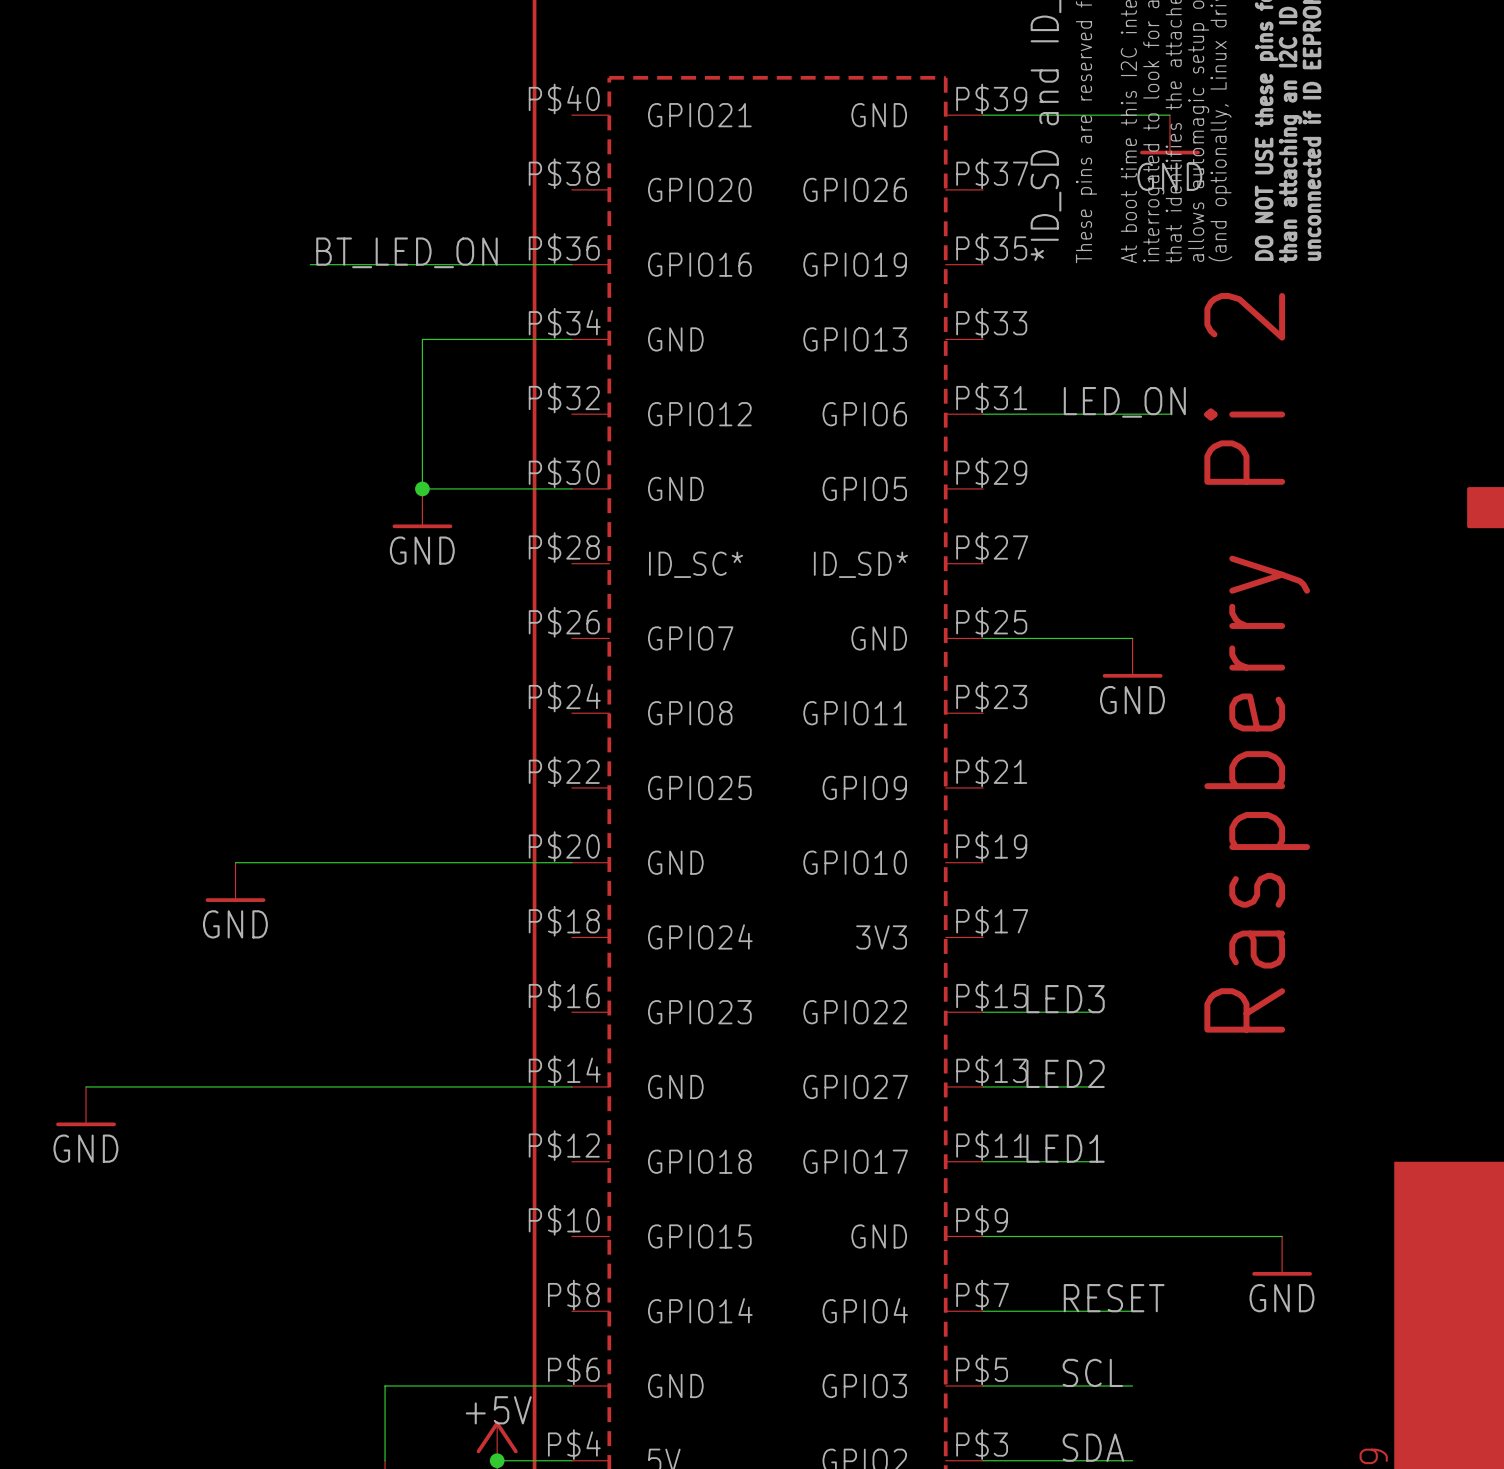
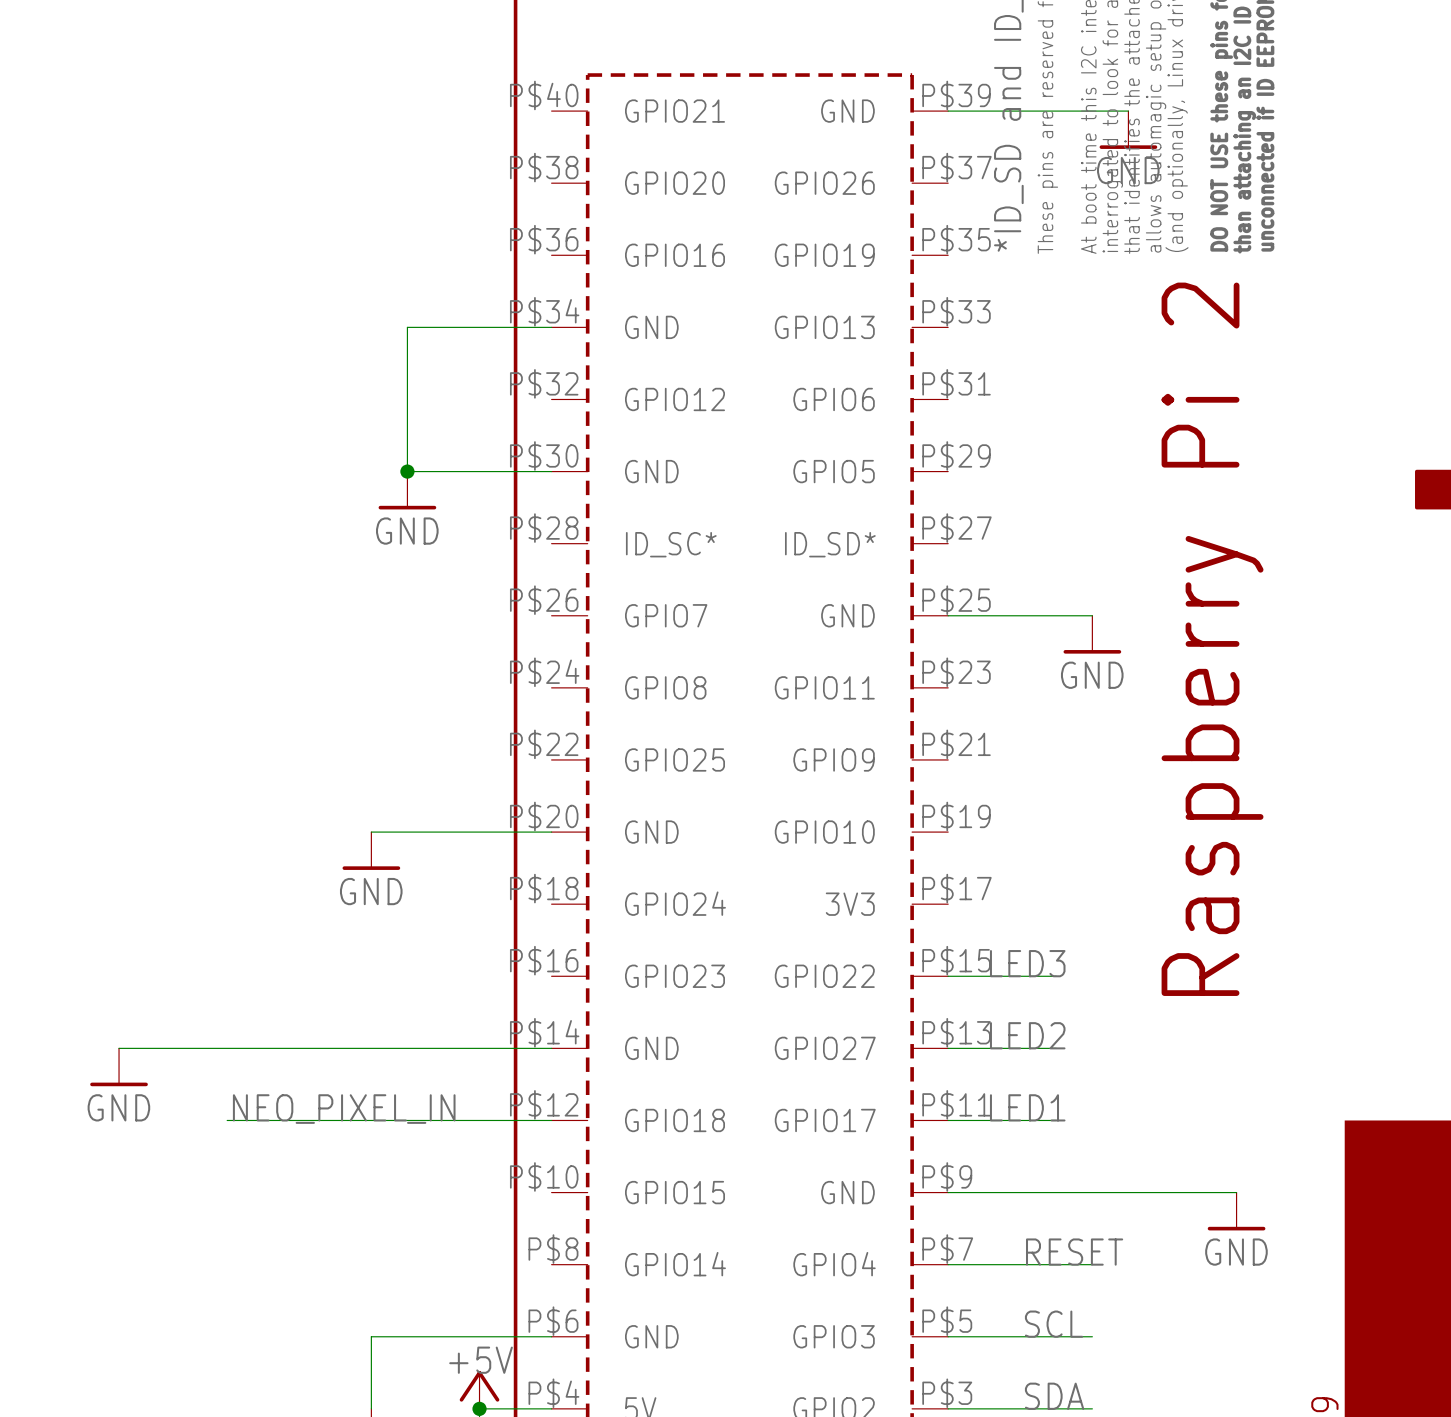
label: BT_LED_ON (406, 252) -> none
wire: (310, 264) (571, 264) -> none
label: LED_ON (1124, 402) -> none
wire: (983, 414) (1169, 414) -> none
wire: (235, 862) (385, 862) -> none
power symbol: GND (235, 882) -> none
power symbol: none -> GND (371, 851)
wire: (86, 1086) (123, 1086) -> none
power symbol position: GND (86, 1106) -> GND (119, 1067)
label: none -> NEO_PIXEL_IN (344, 1109)
wire: none -> (227, 1120) (551, 1120)

